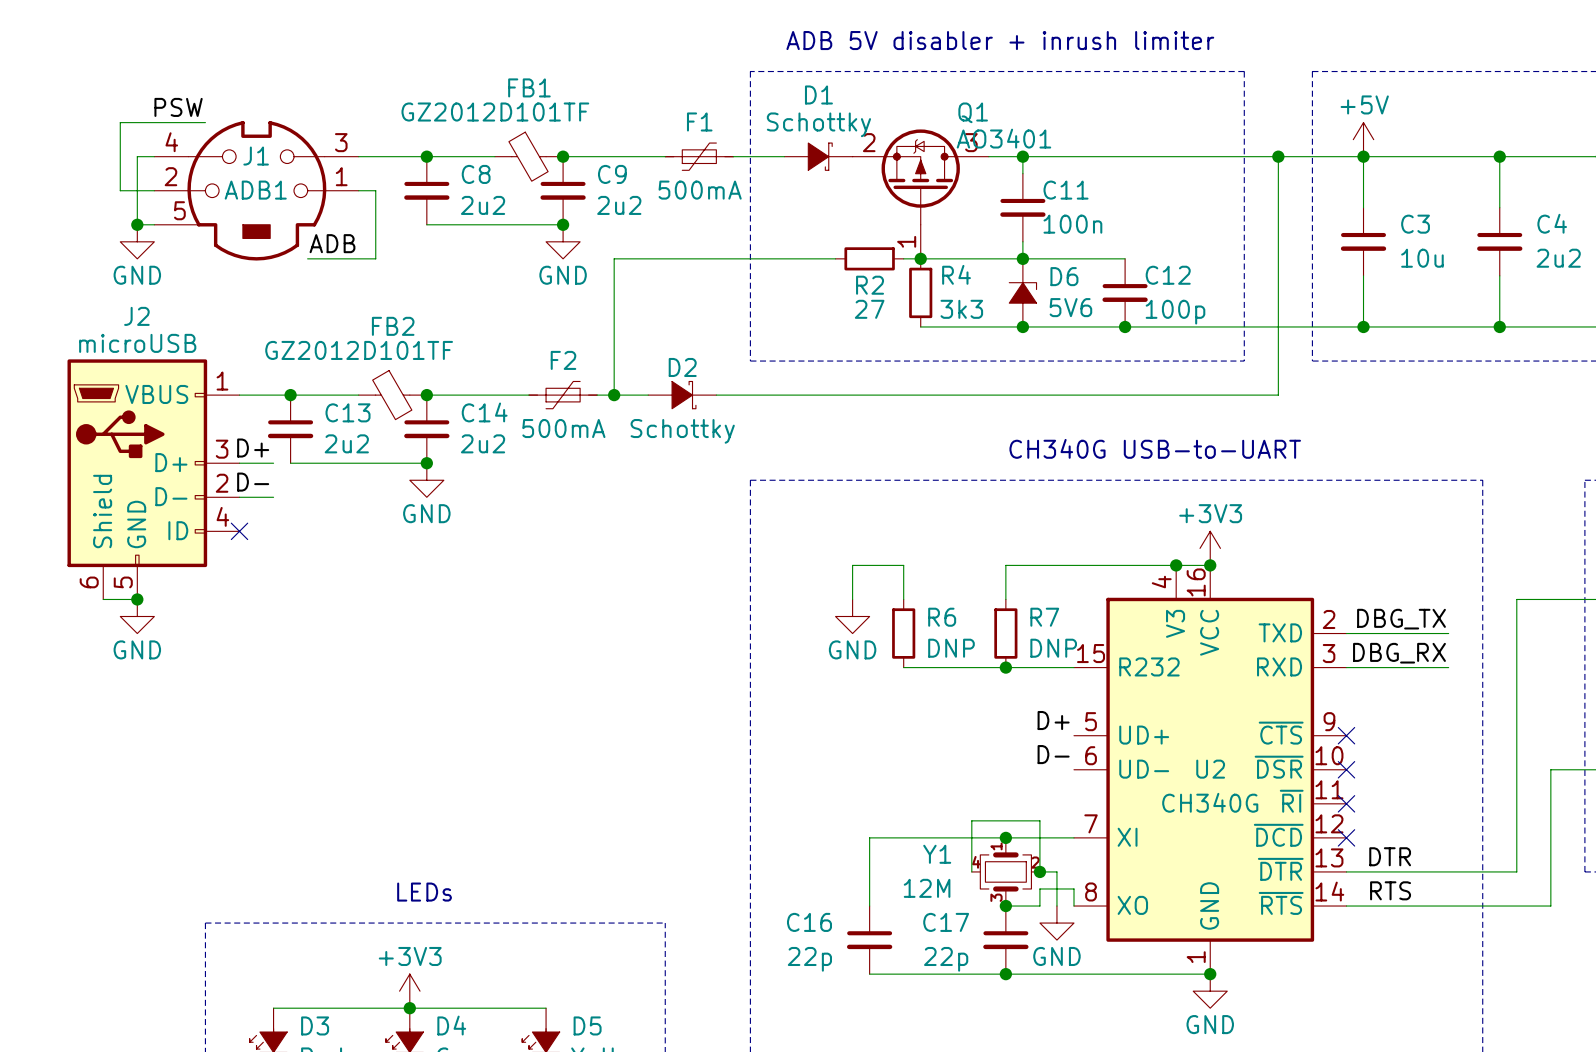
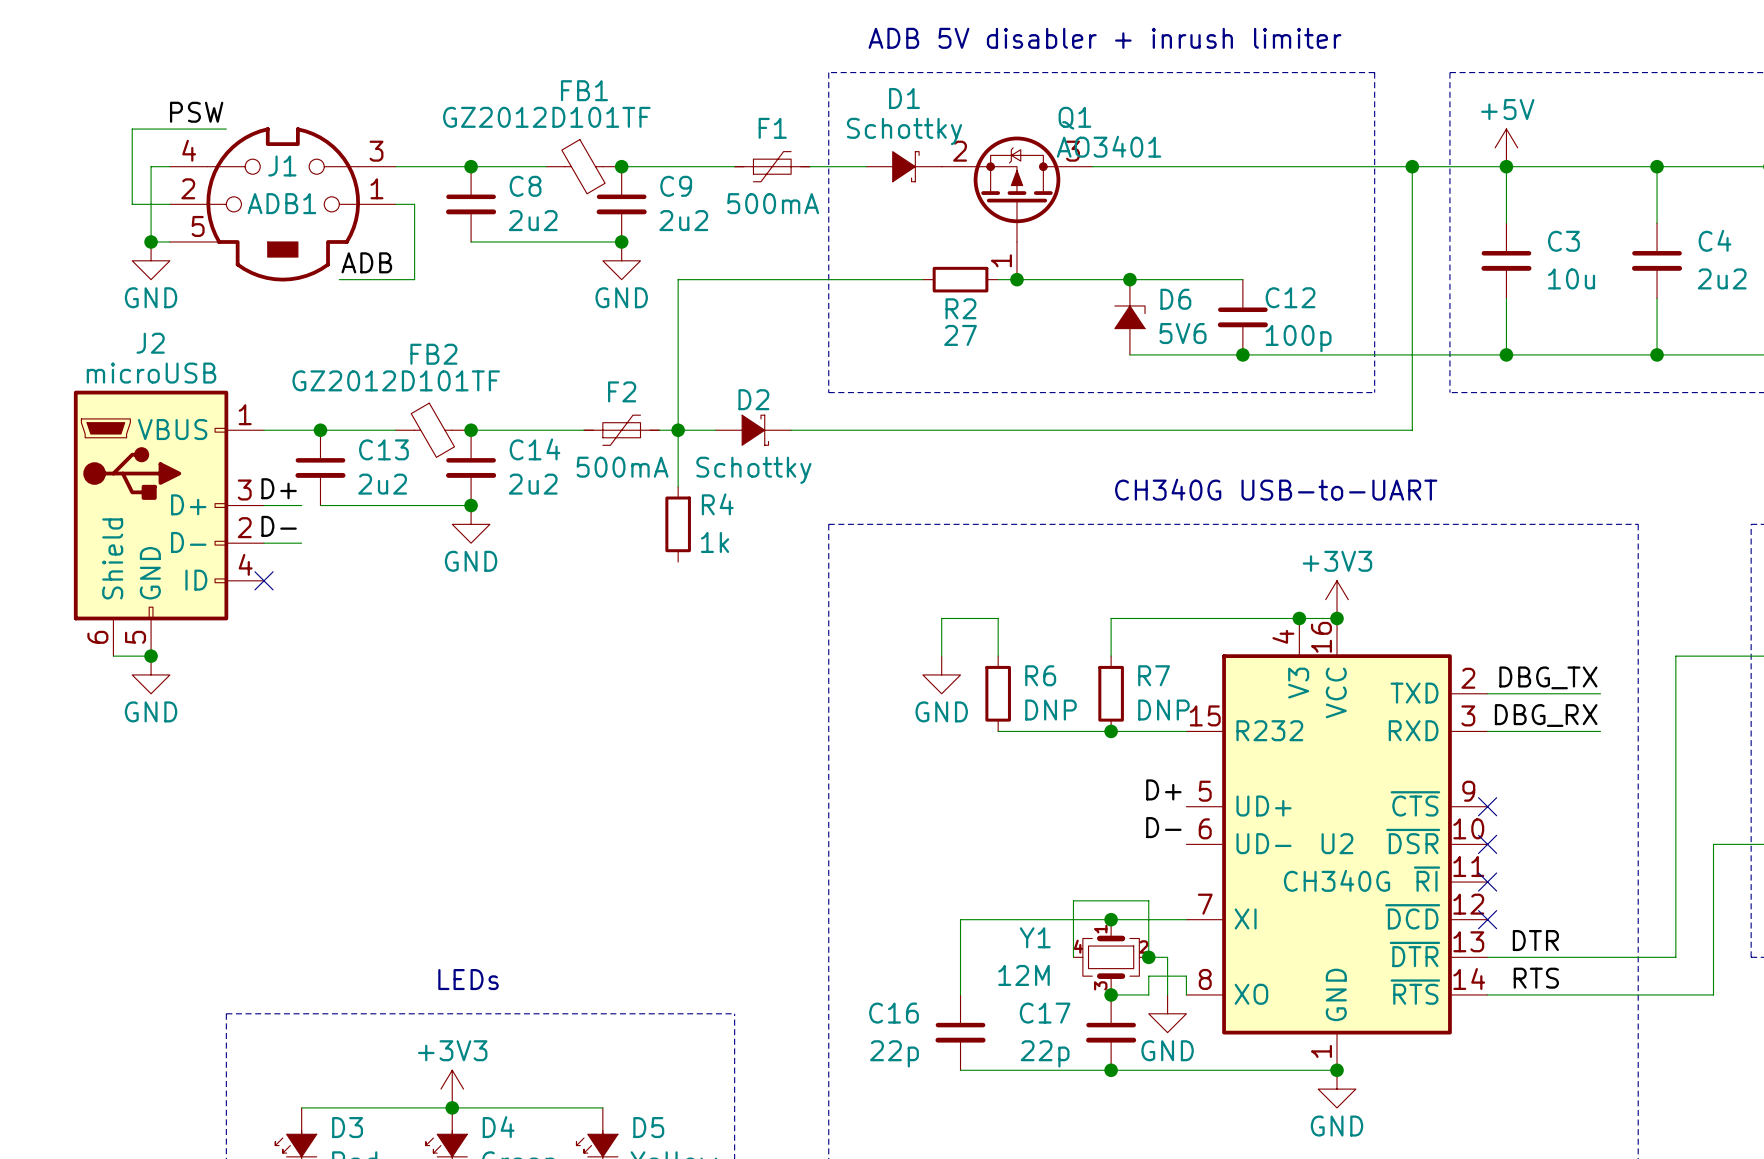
wire: (1022, 156) (1022, 173) -> none
junction: (1022, 156) -> none
C11: 100n (1022, 207) -> none
wire: (1022, 241) (1022, 258) -> none
R4 position: (920, 292) -> (678, 524)
R4 value: 3k3 (961, 309) -> 1k (715, 542)
wire: (920, 326) (1022, 326) -> none
junction: (1022, 326) -> none
wire: none -> (678, 430) (678, 486)

